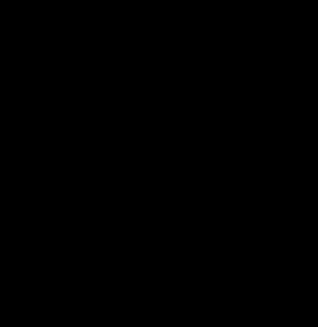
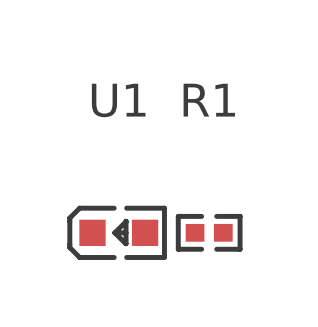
U1: none -> (117, 232)
R1: none -> (209, 232)

